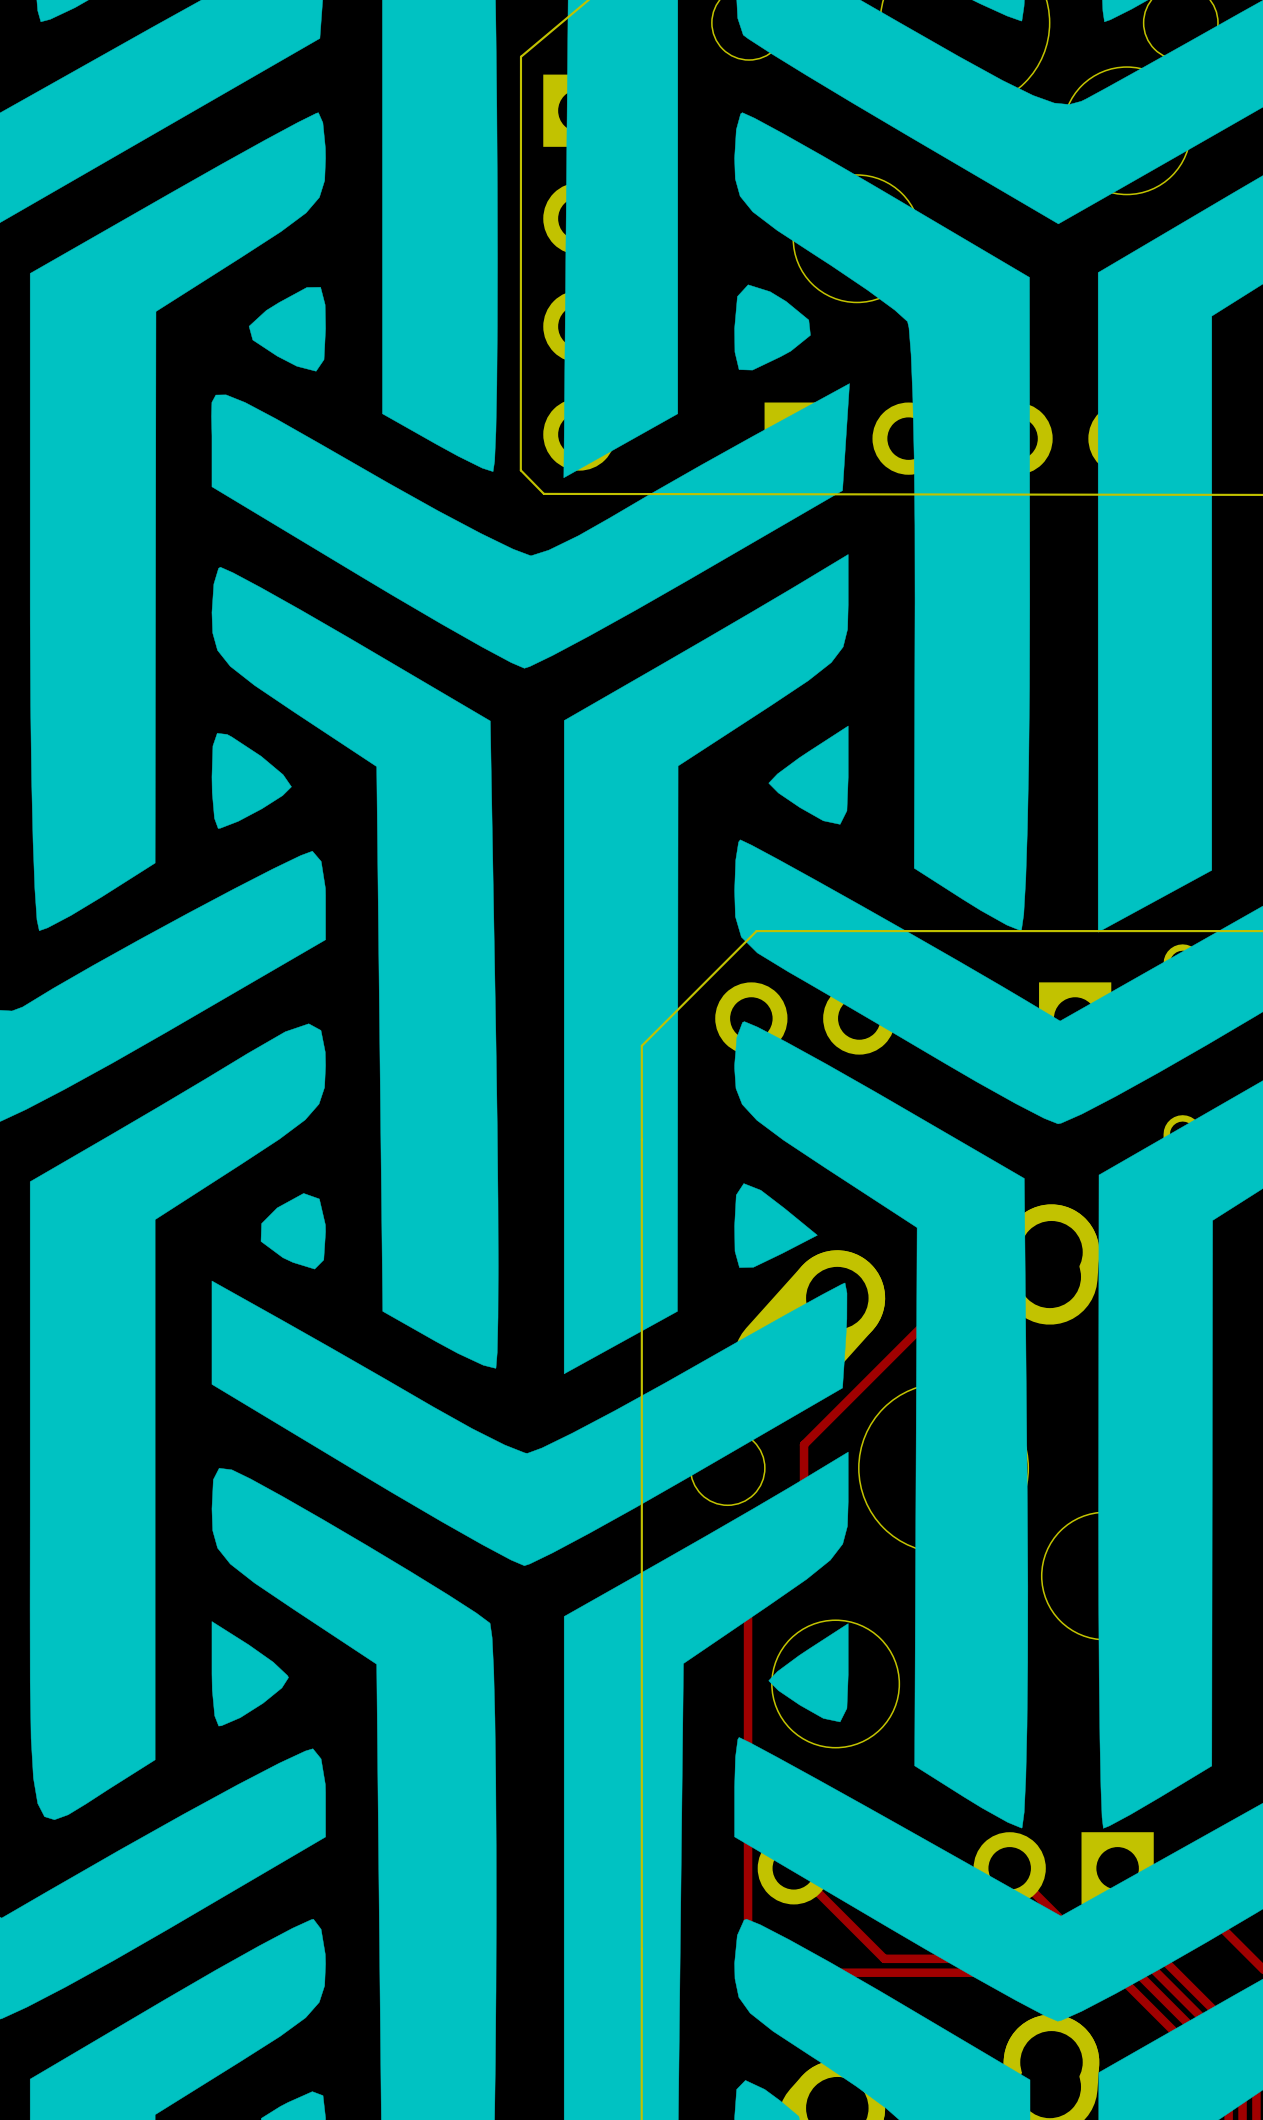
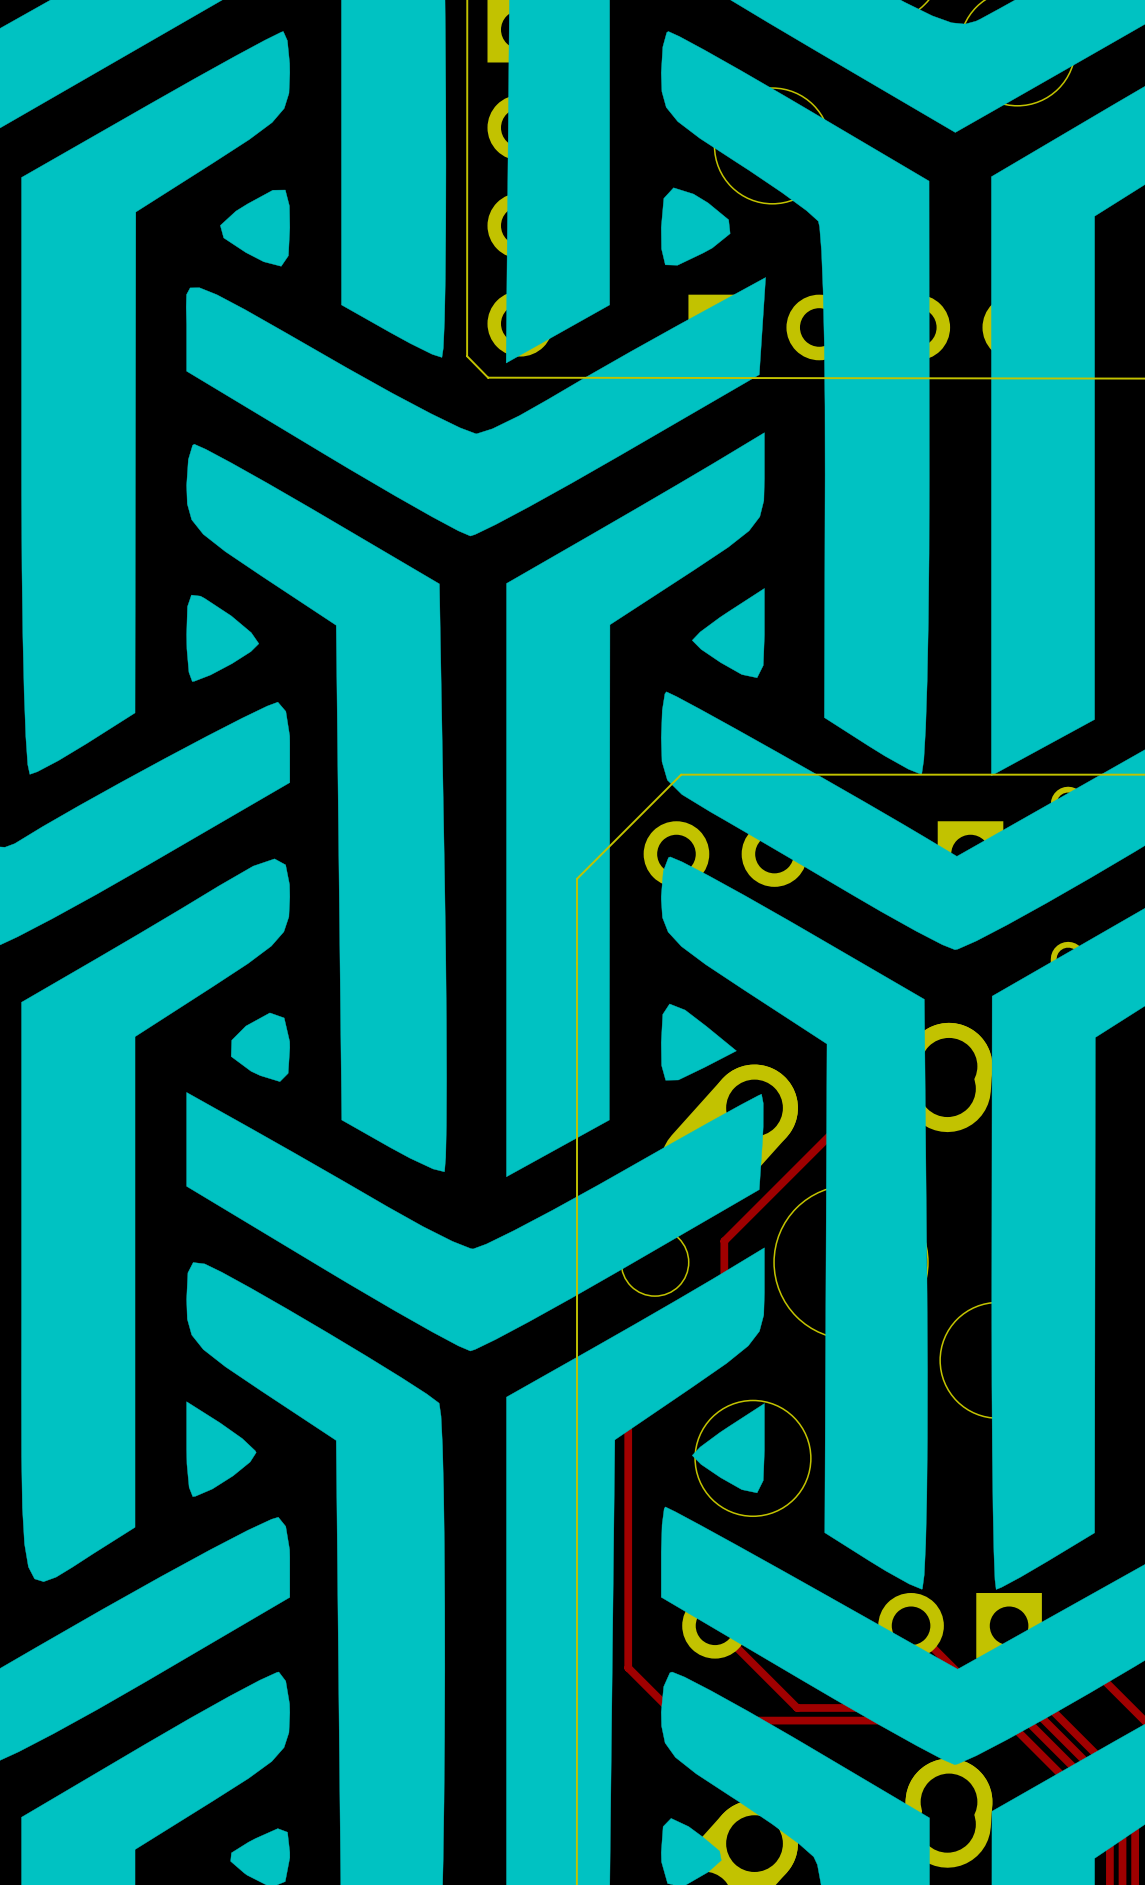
track: (748, 1577) (748, 1926) (794, 1972) -> (673, 1361) (628, 1406) (628, 1667) (680, 1720) (715, 1720)

